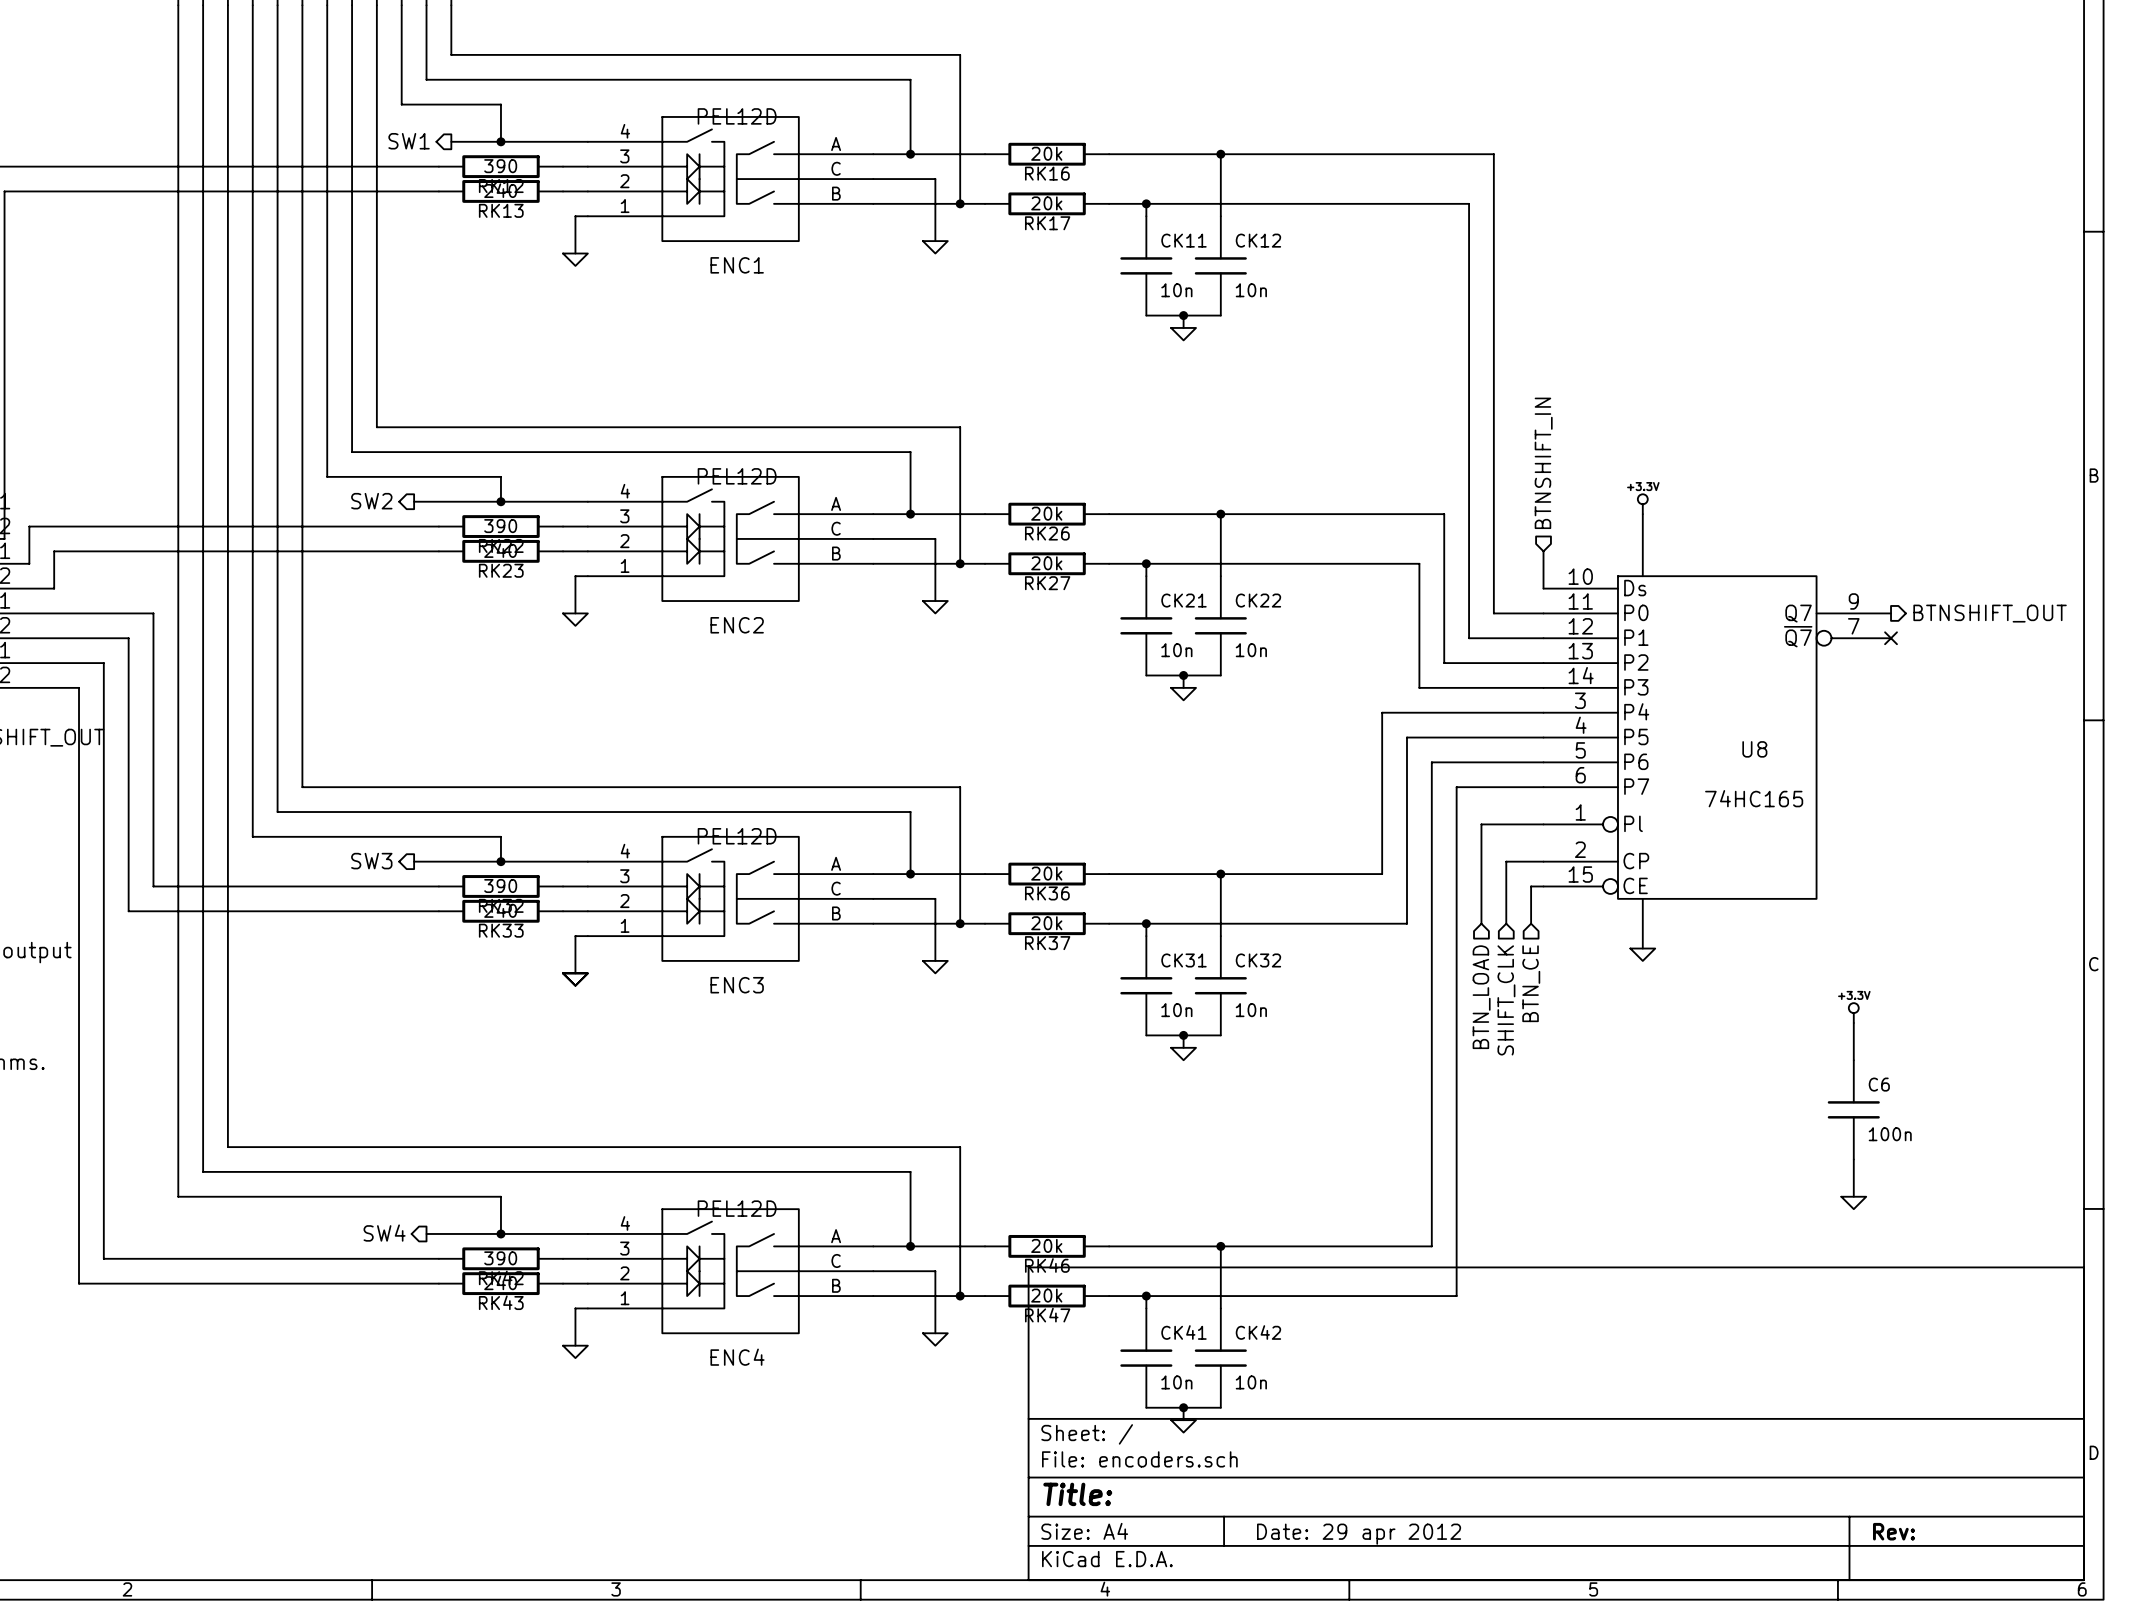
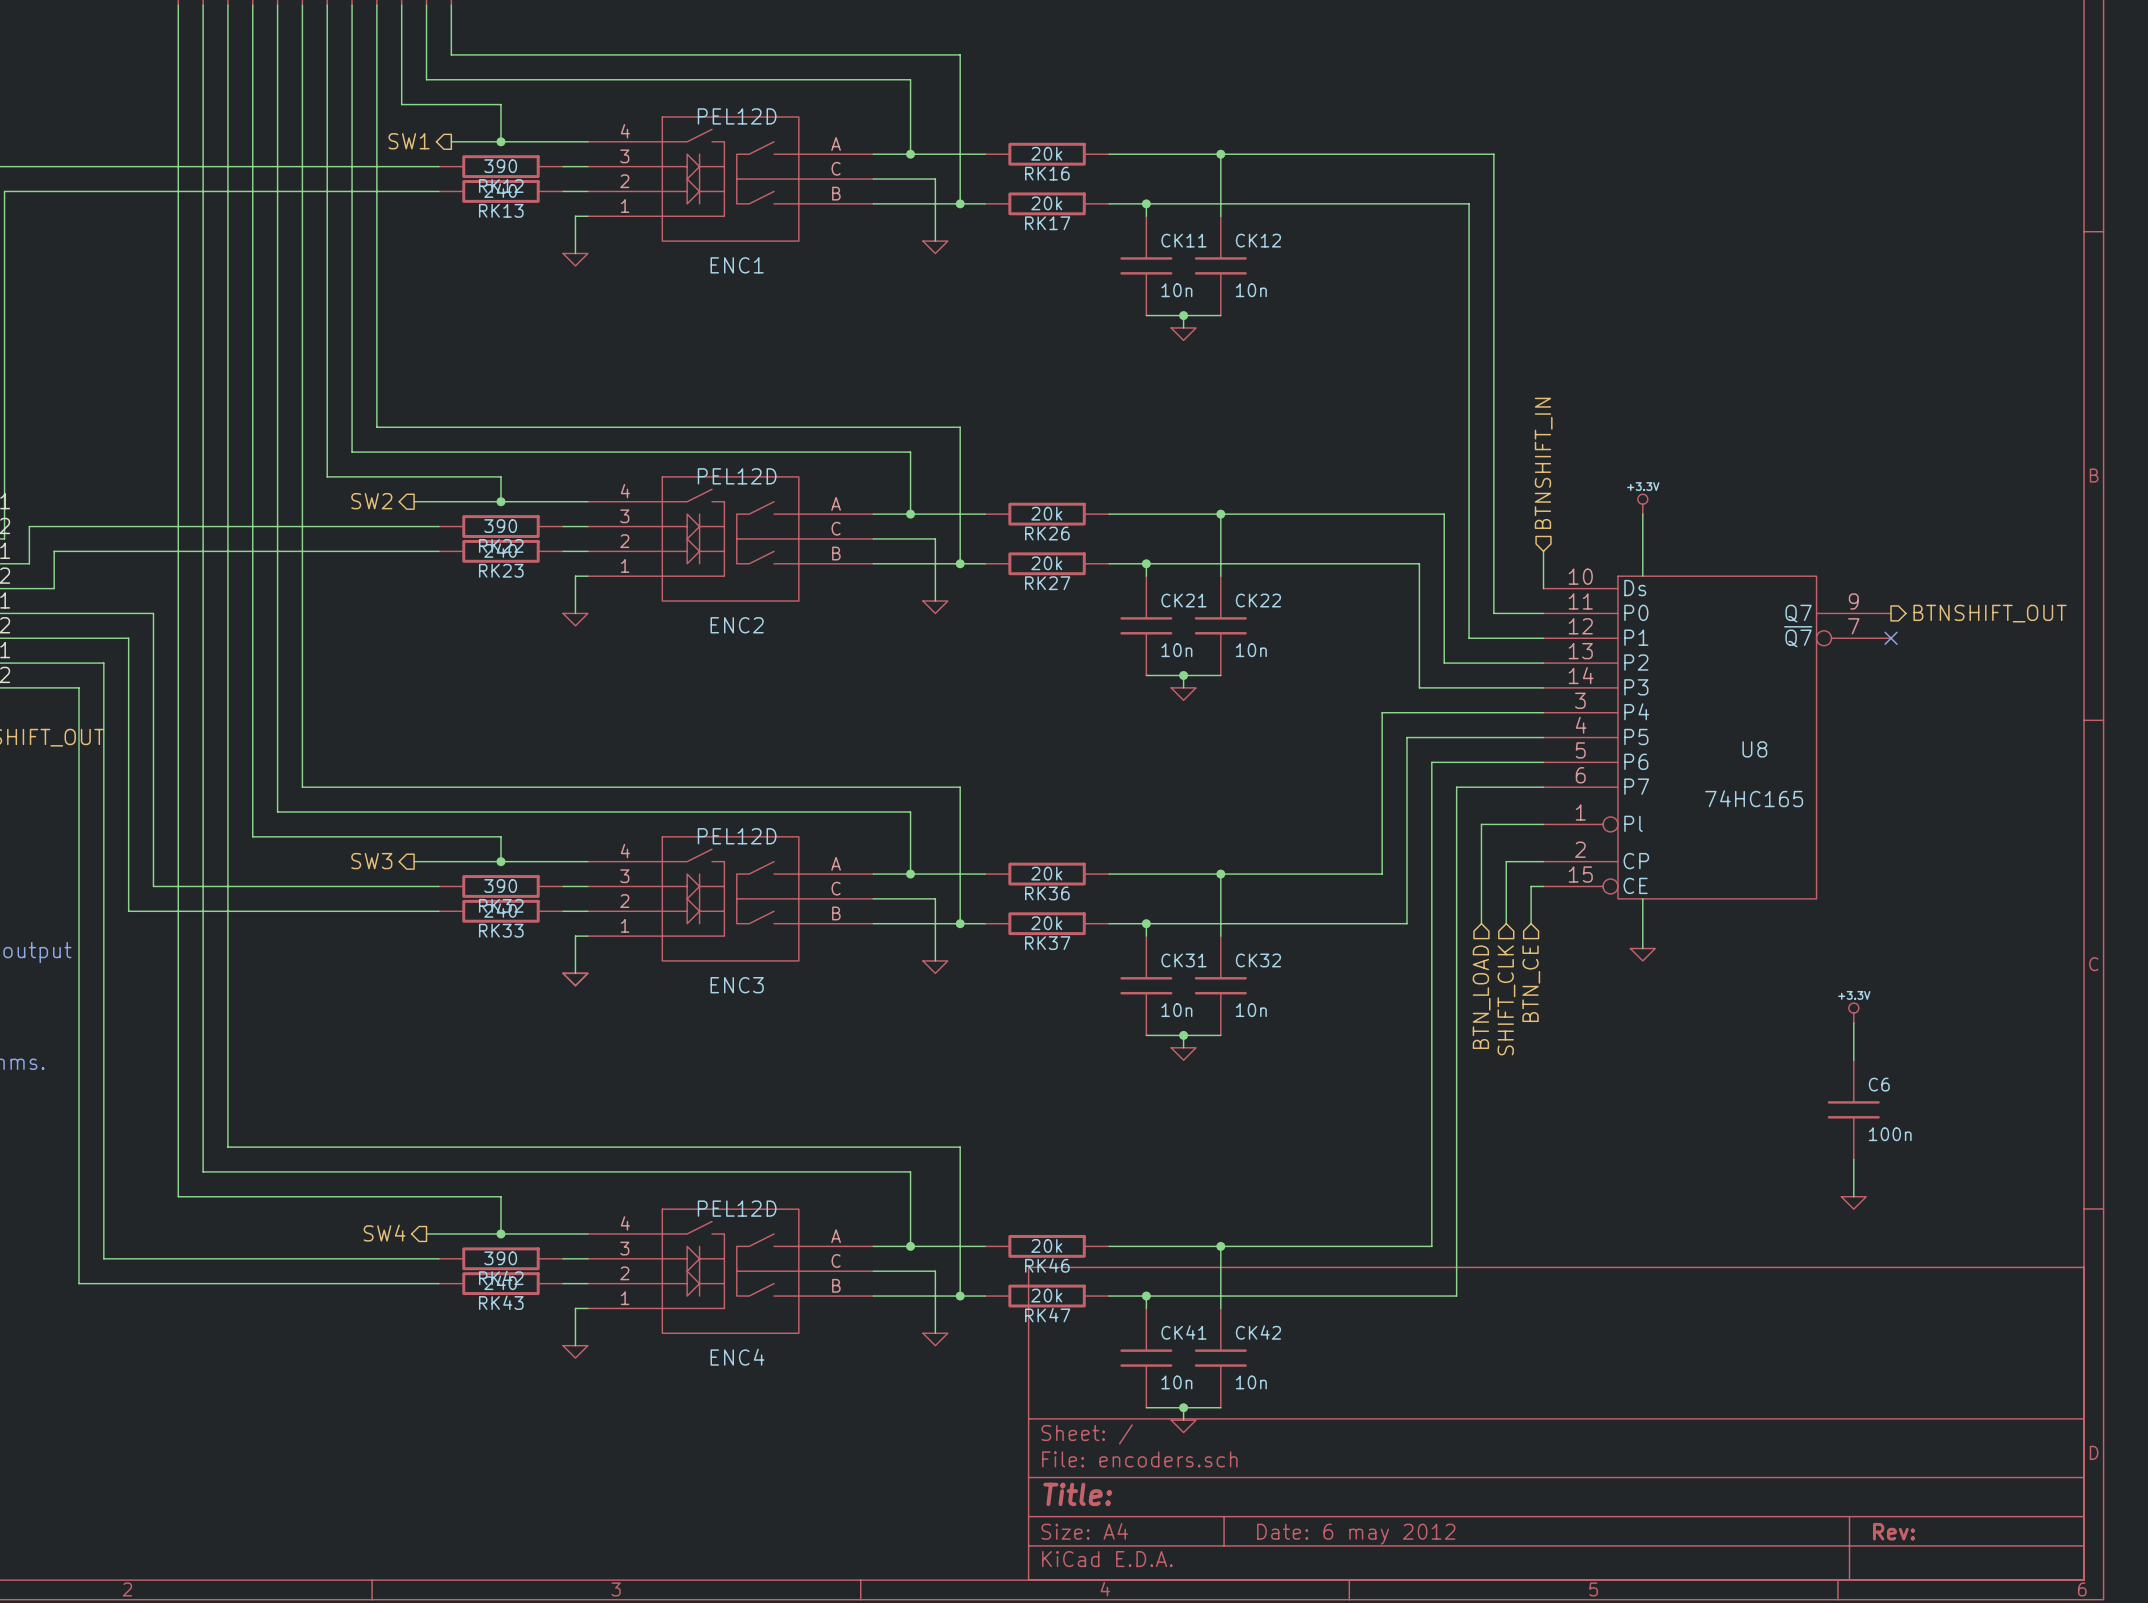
title block: Date: 29 apr 2012 (1359, 1534) -> Date: 6 may 2012 (1356, 1534)

